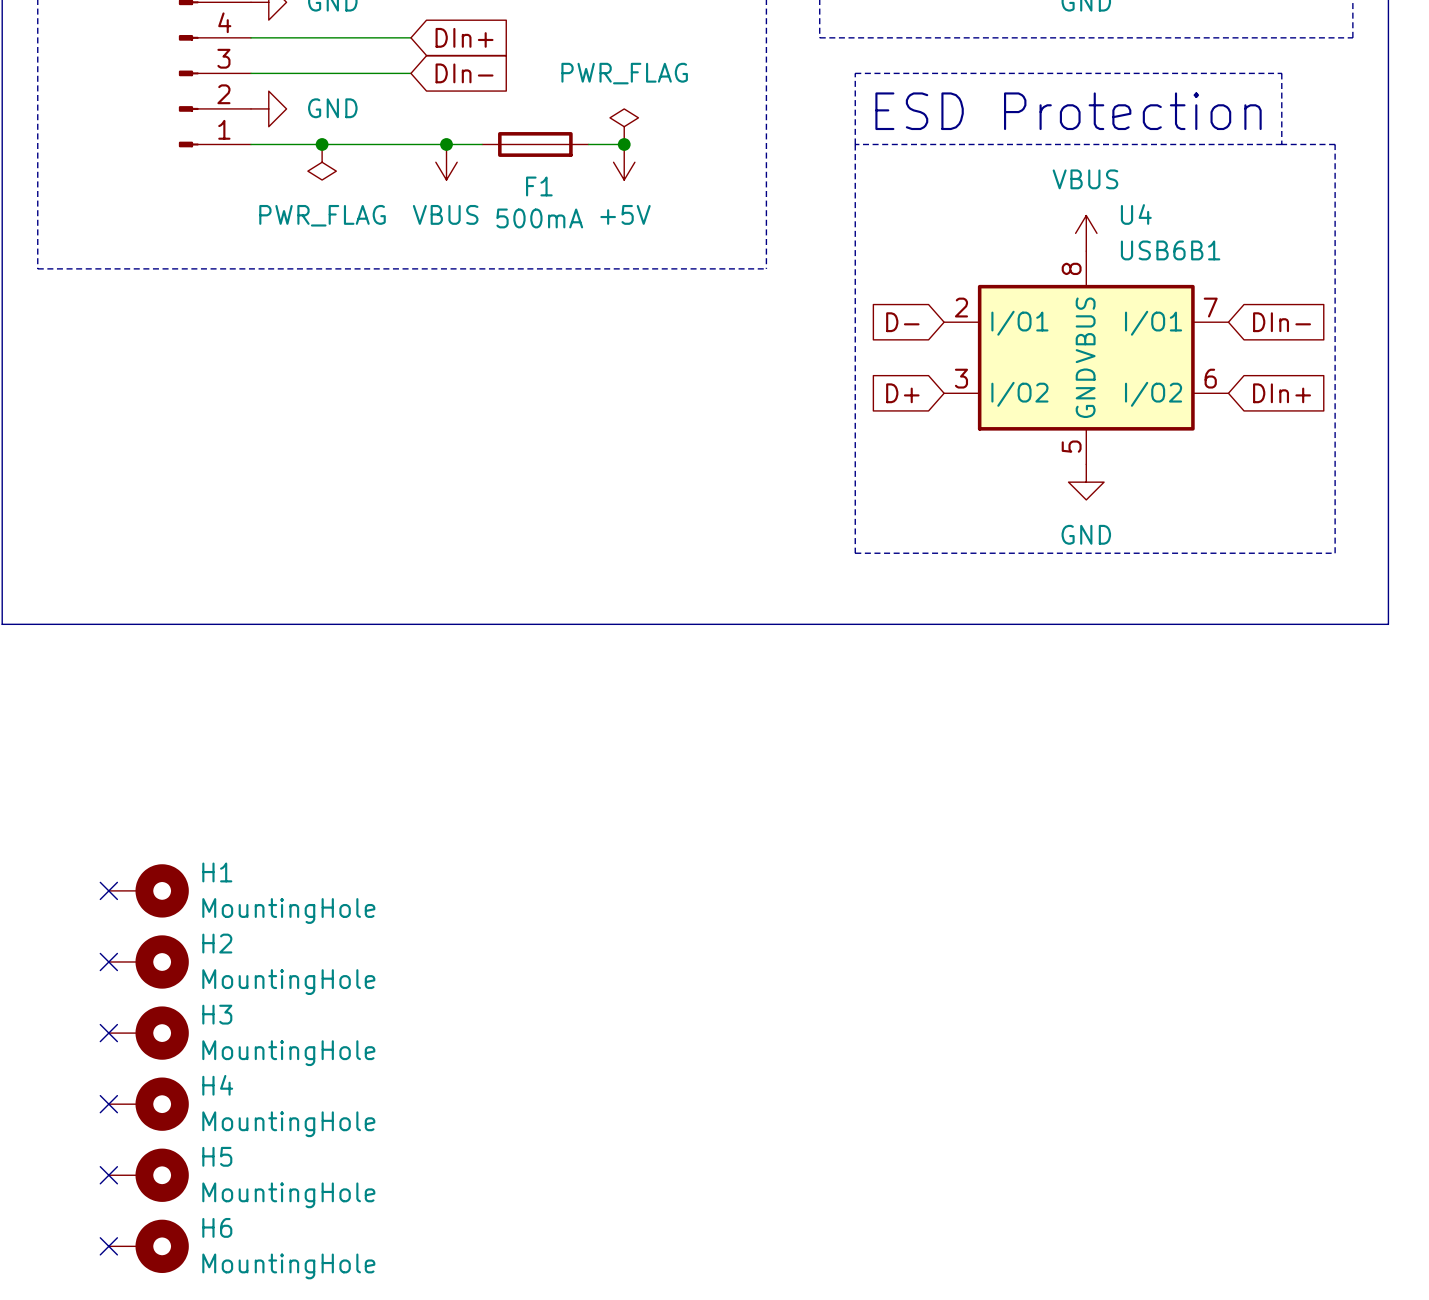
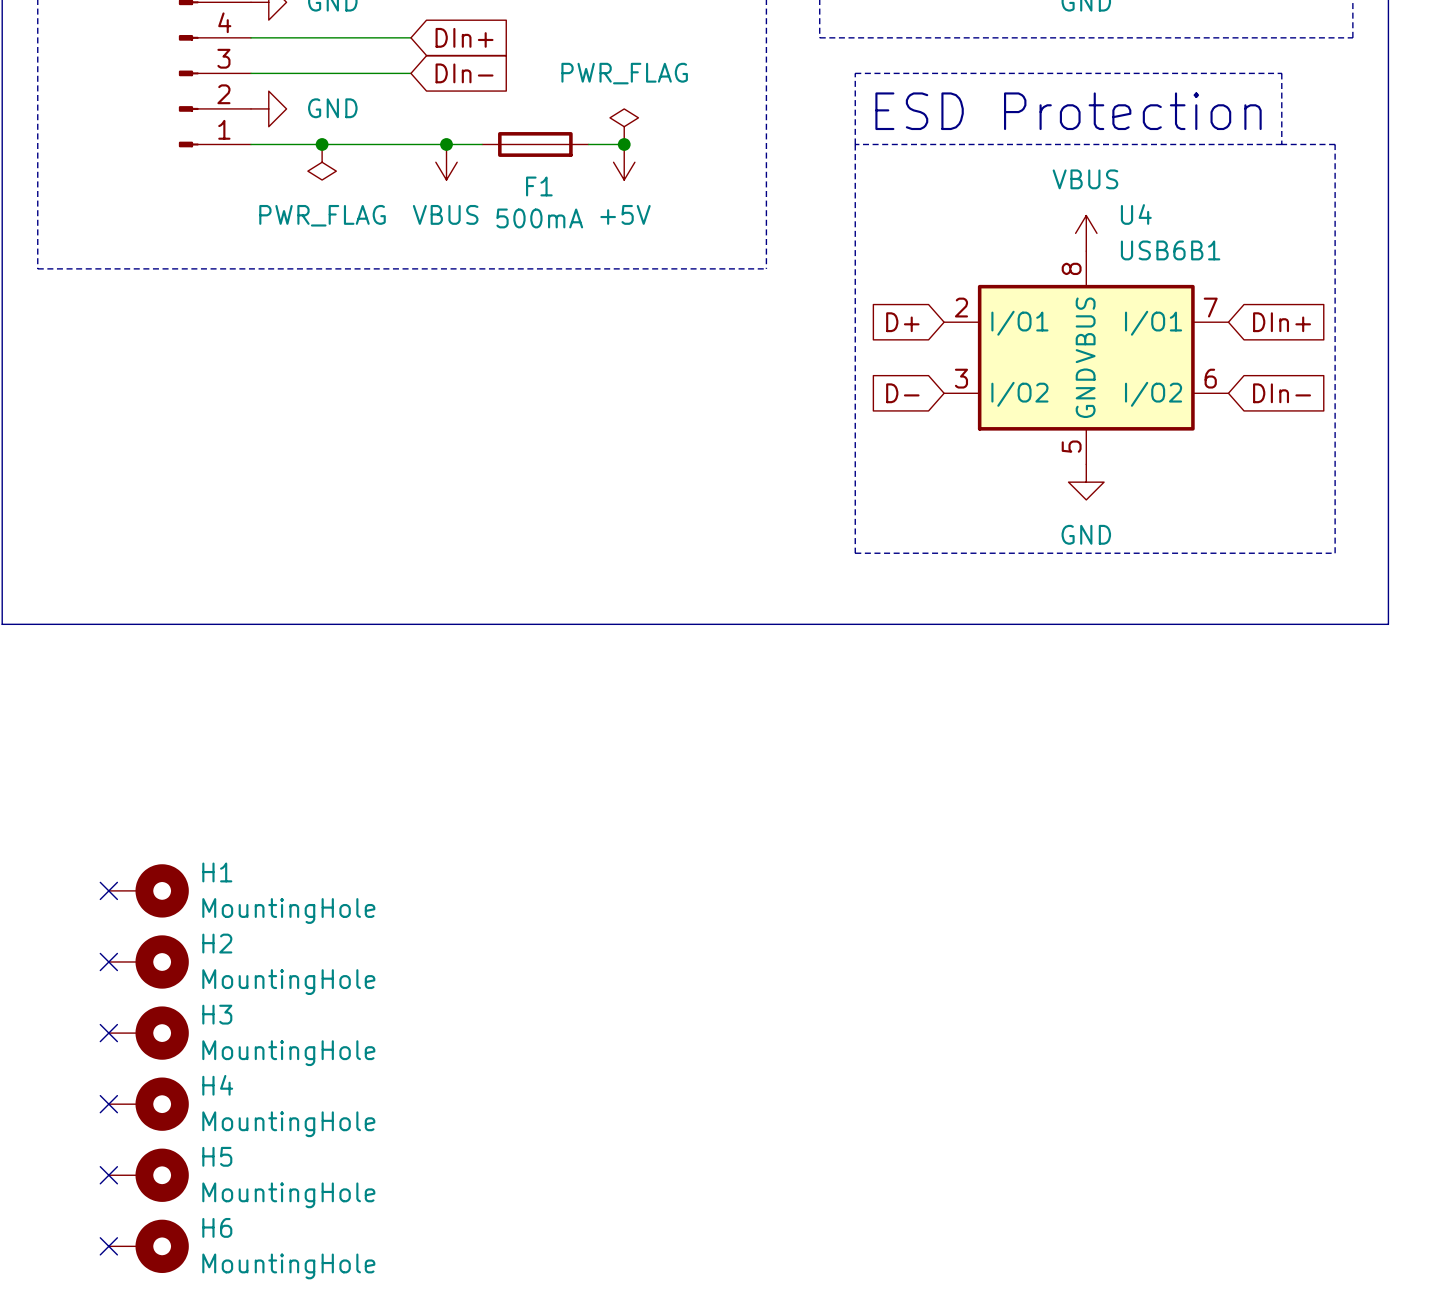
global label: D- (902, 322) -> D+ (902, 322)
global label: DIn- (1282, 322) -> DIn+ (1282, 322)
global label: D+ (902, 393) -> D- (902, 393)
global label: DIn+ (1282, 393) -> DIn- (1282, 393)

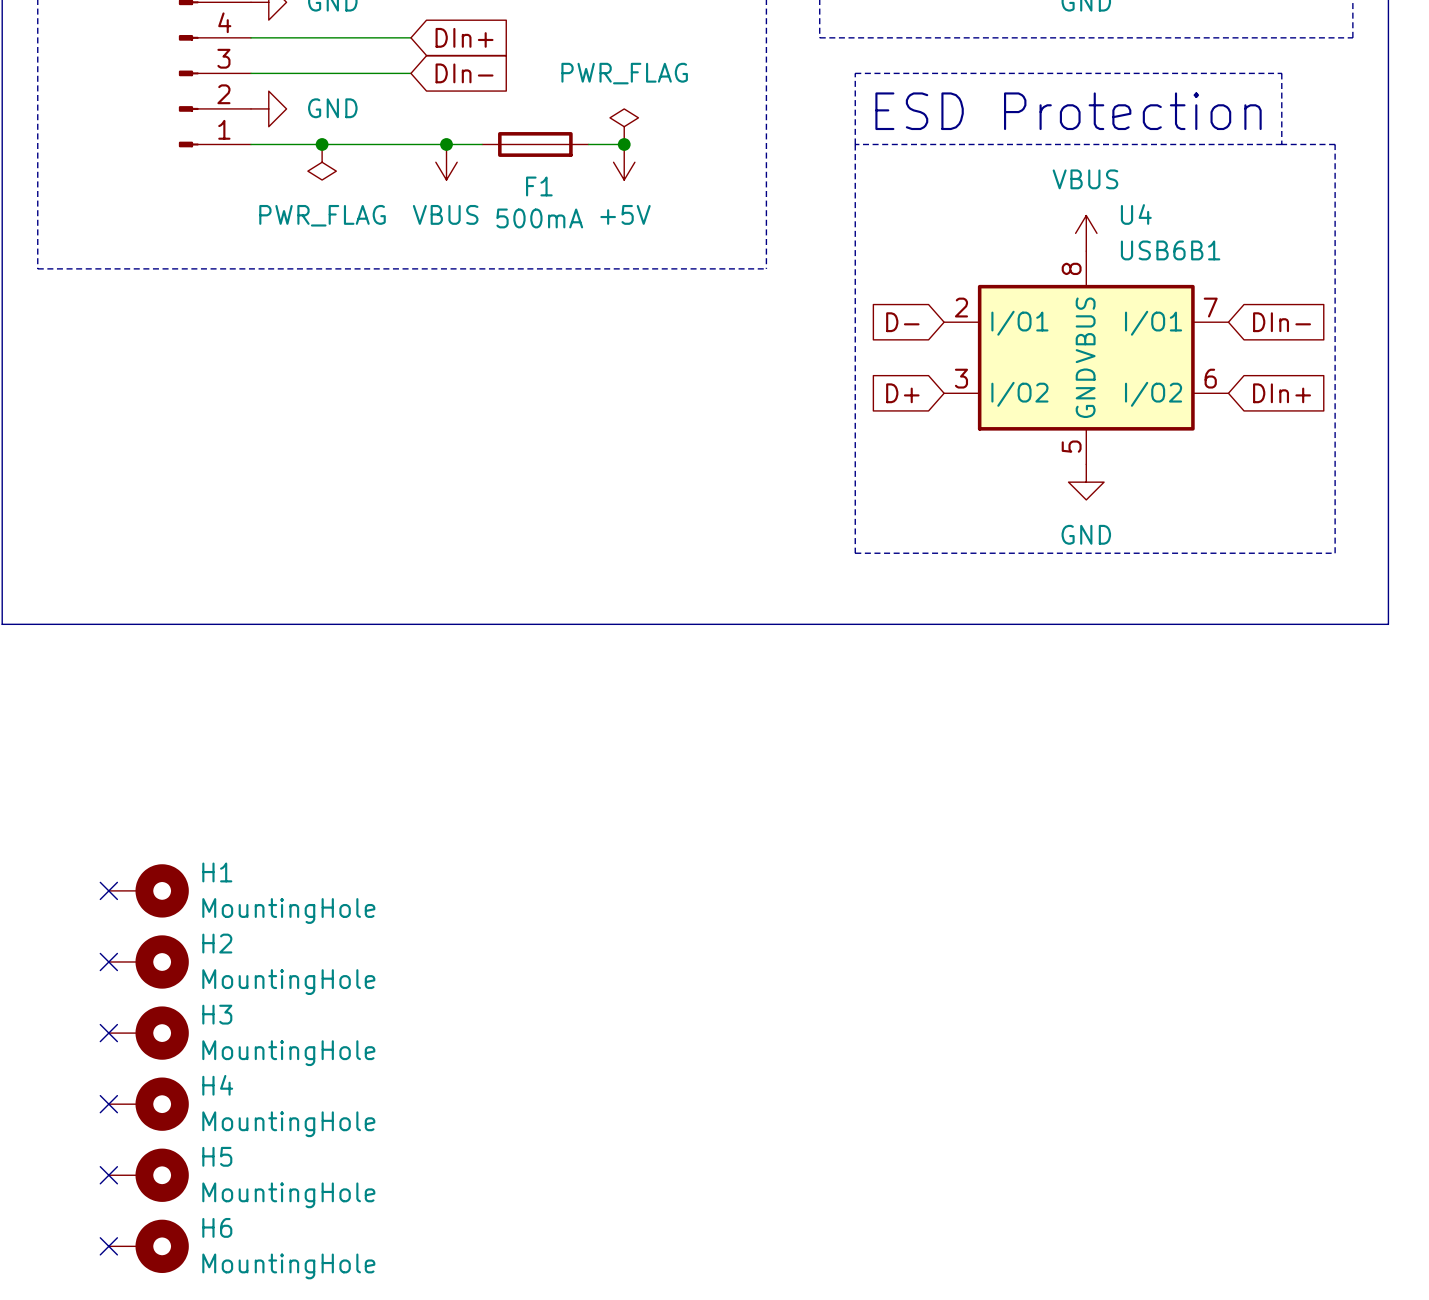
global label: D+ (902, 322) -> D- (902, 322)
global label: DIn+ (1282, 322) -> DIn- (1282, 322)
global label: D- (902, 393) -> D+ (902, 393)
global label: DIn- (1282, 393) -> DIn+ (1282, 393)

